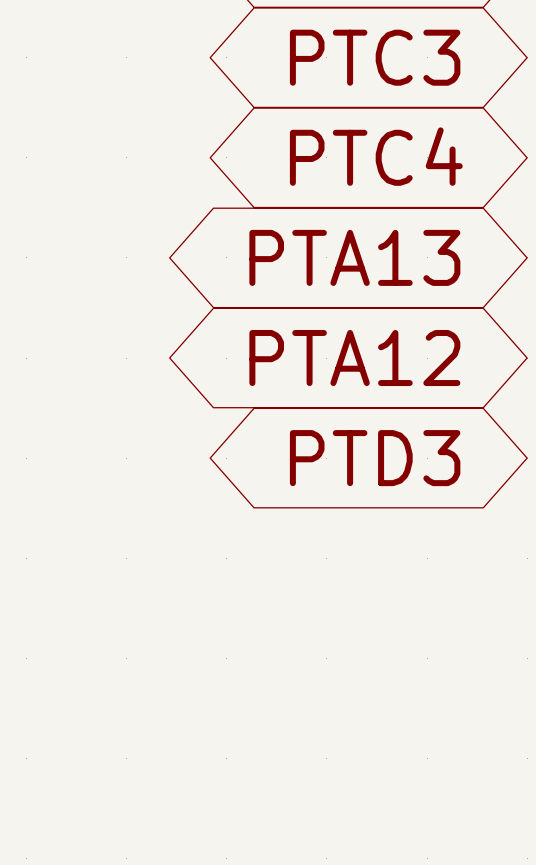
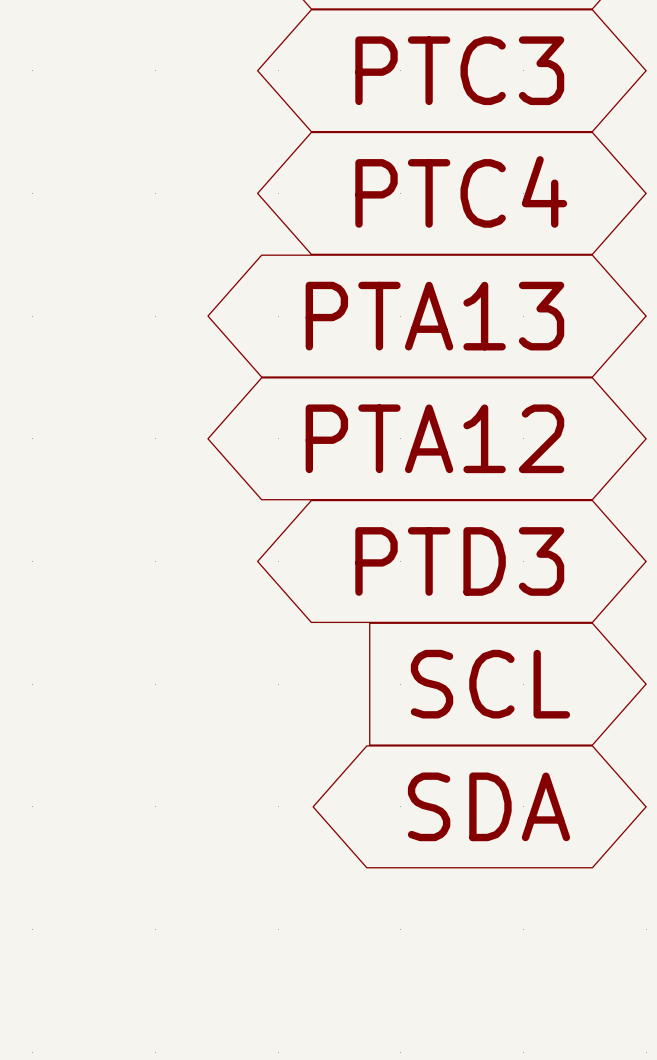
global label: none -> SCL (490, 684)
global label: none -> SDA (488, 806)

